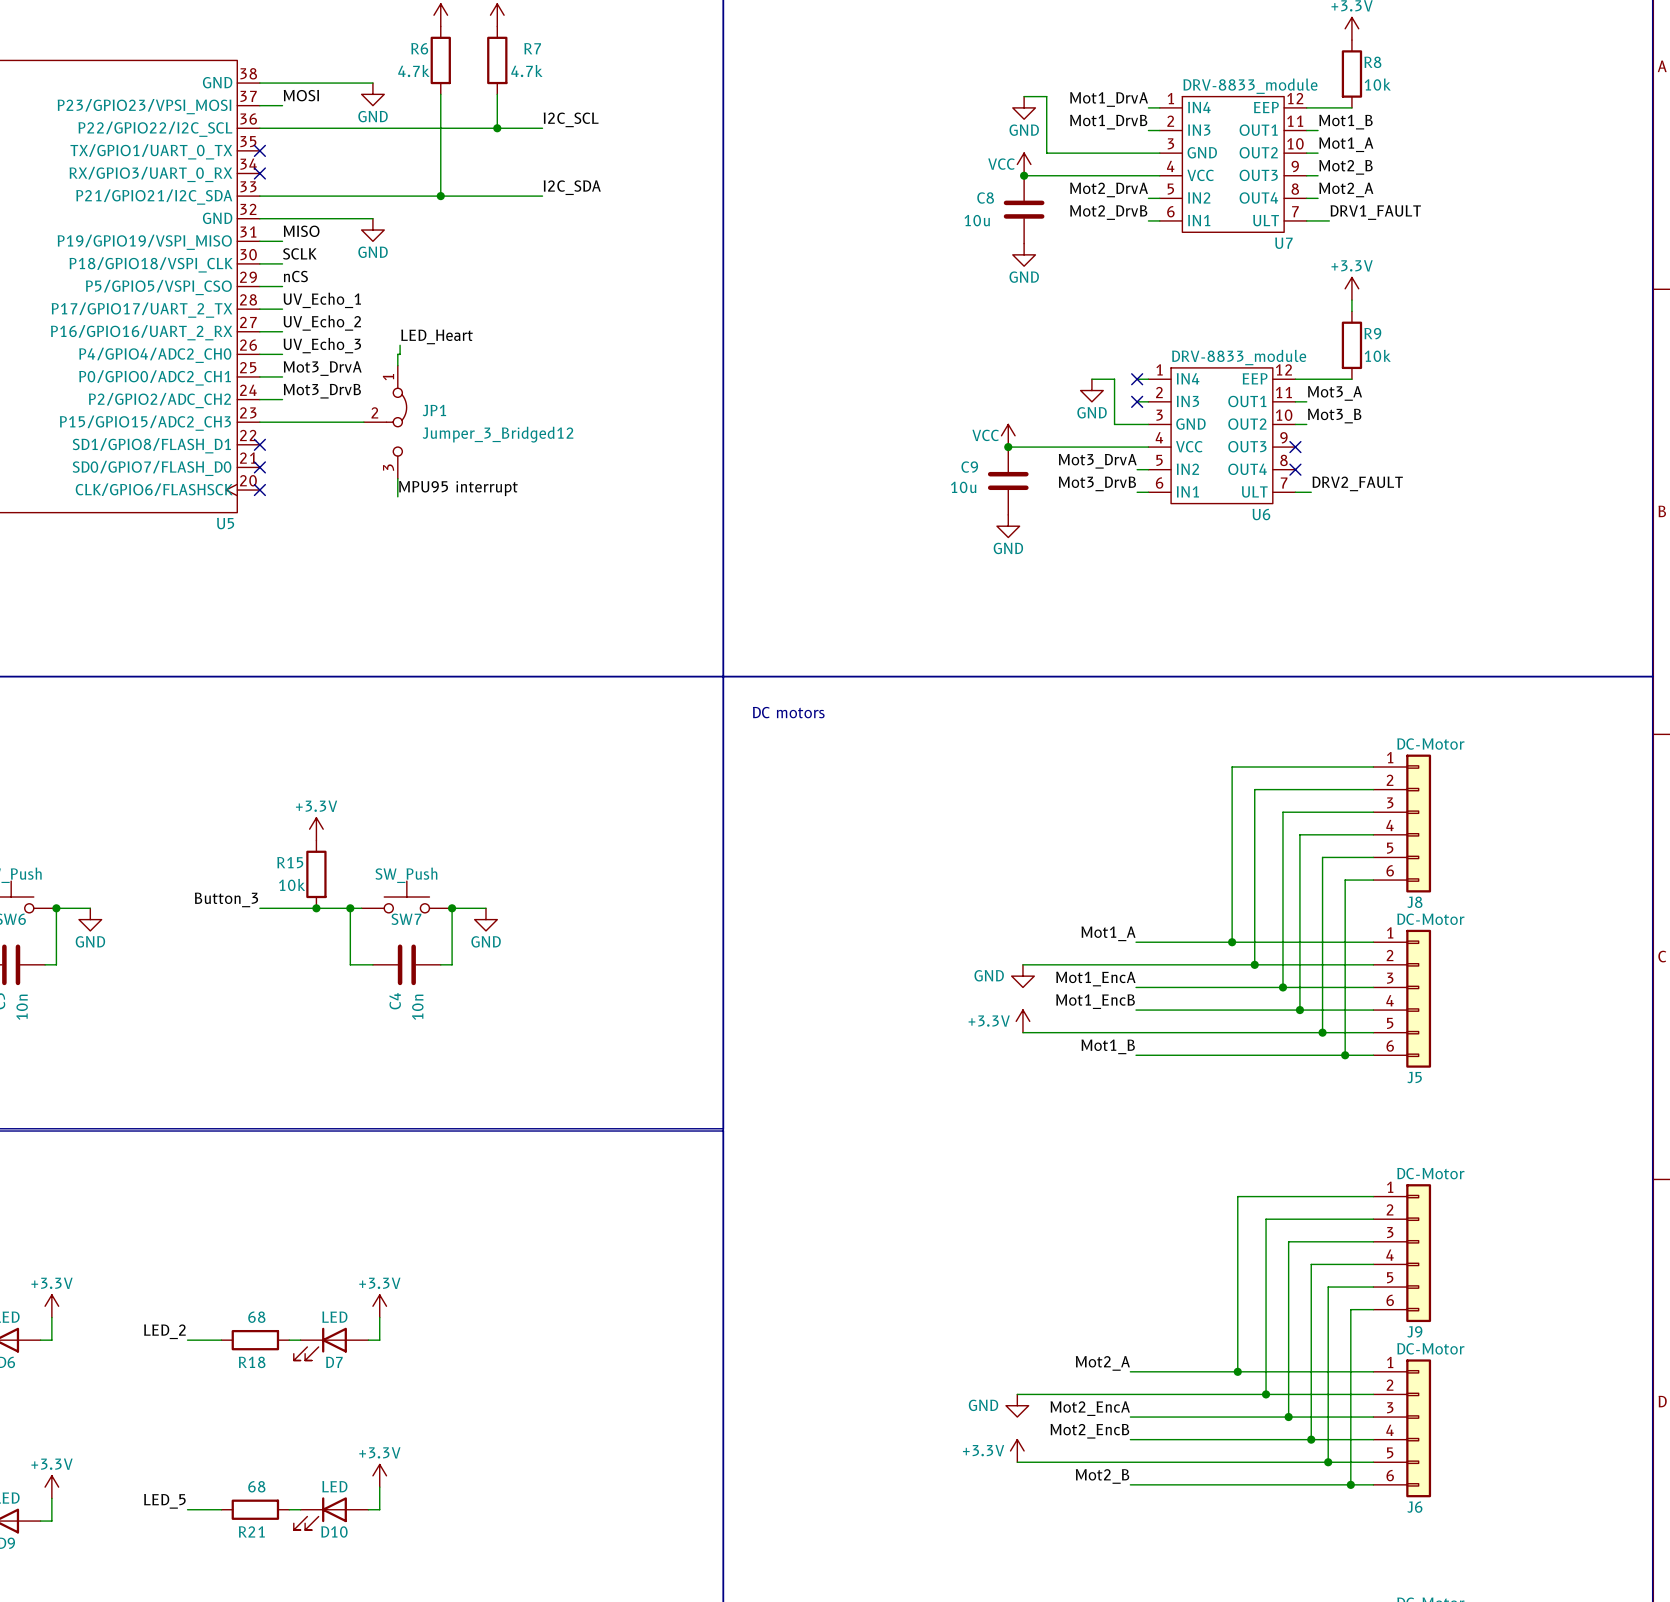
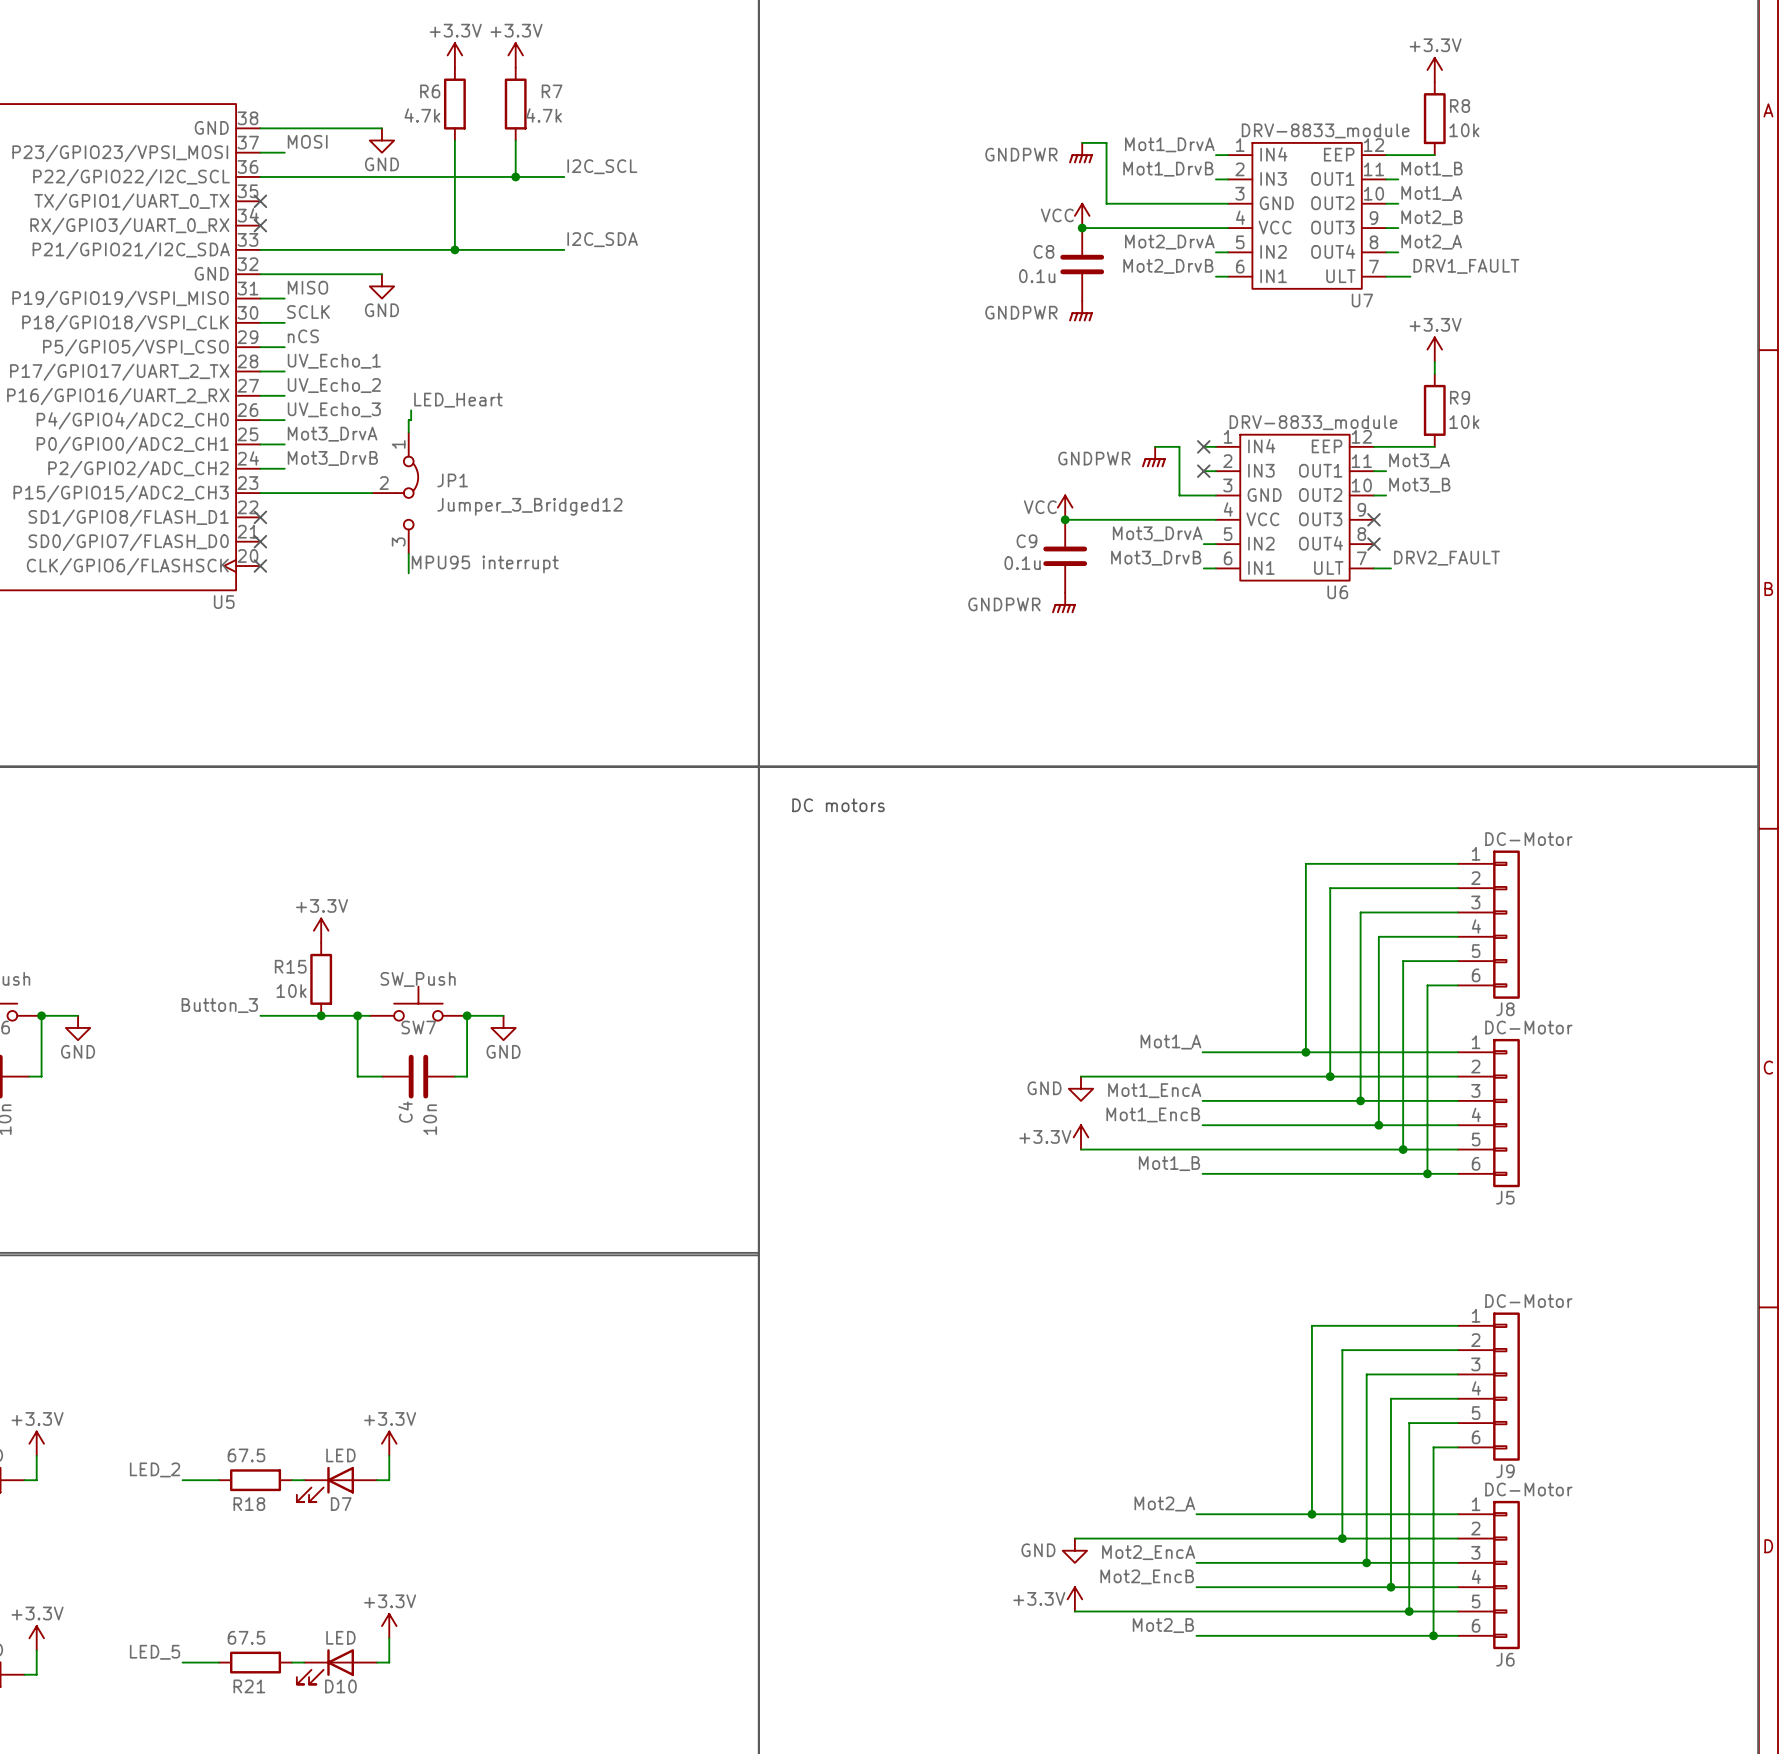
power symbol: GND (1024, 107) -> GNDPWR (1080, 153)
C8 value: 10u (977, 220) -> 0.1u (1037, 276)
power symbol: GND (1024, 254) -> GNDPWR (1080, 311)
power symbol: GND (1091, 390) -> GNDPWR (1153, 457)
C9 value: 10u (963, 487) -> 0.1u (1022, 563)
power symbol: GND (1008, 526) -> GNDPWR (1063, 602)
R18 value: 68 (256, 1317) -> 67.5 (246, 1455)
R21 value: 68 (256, 1486) -> 67.5 (246, 1637)

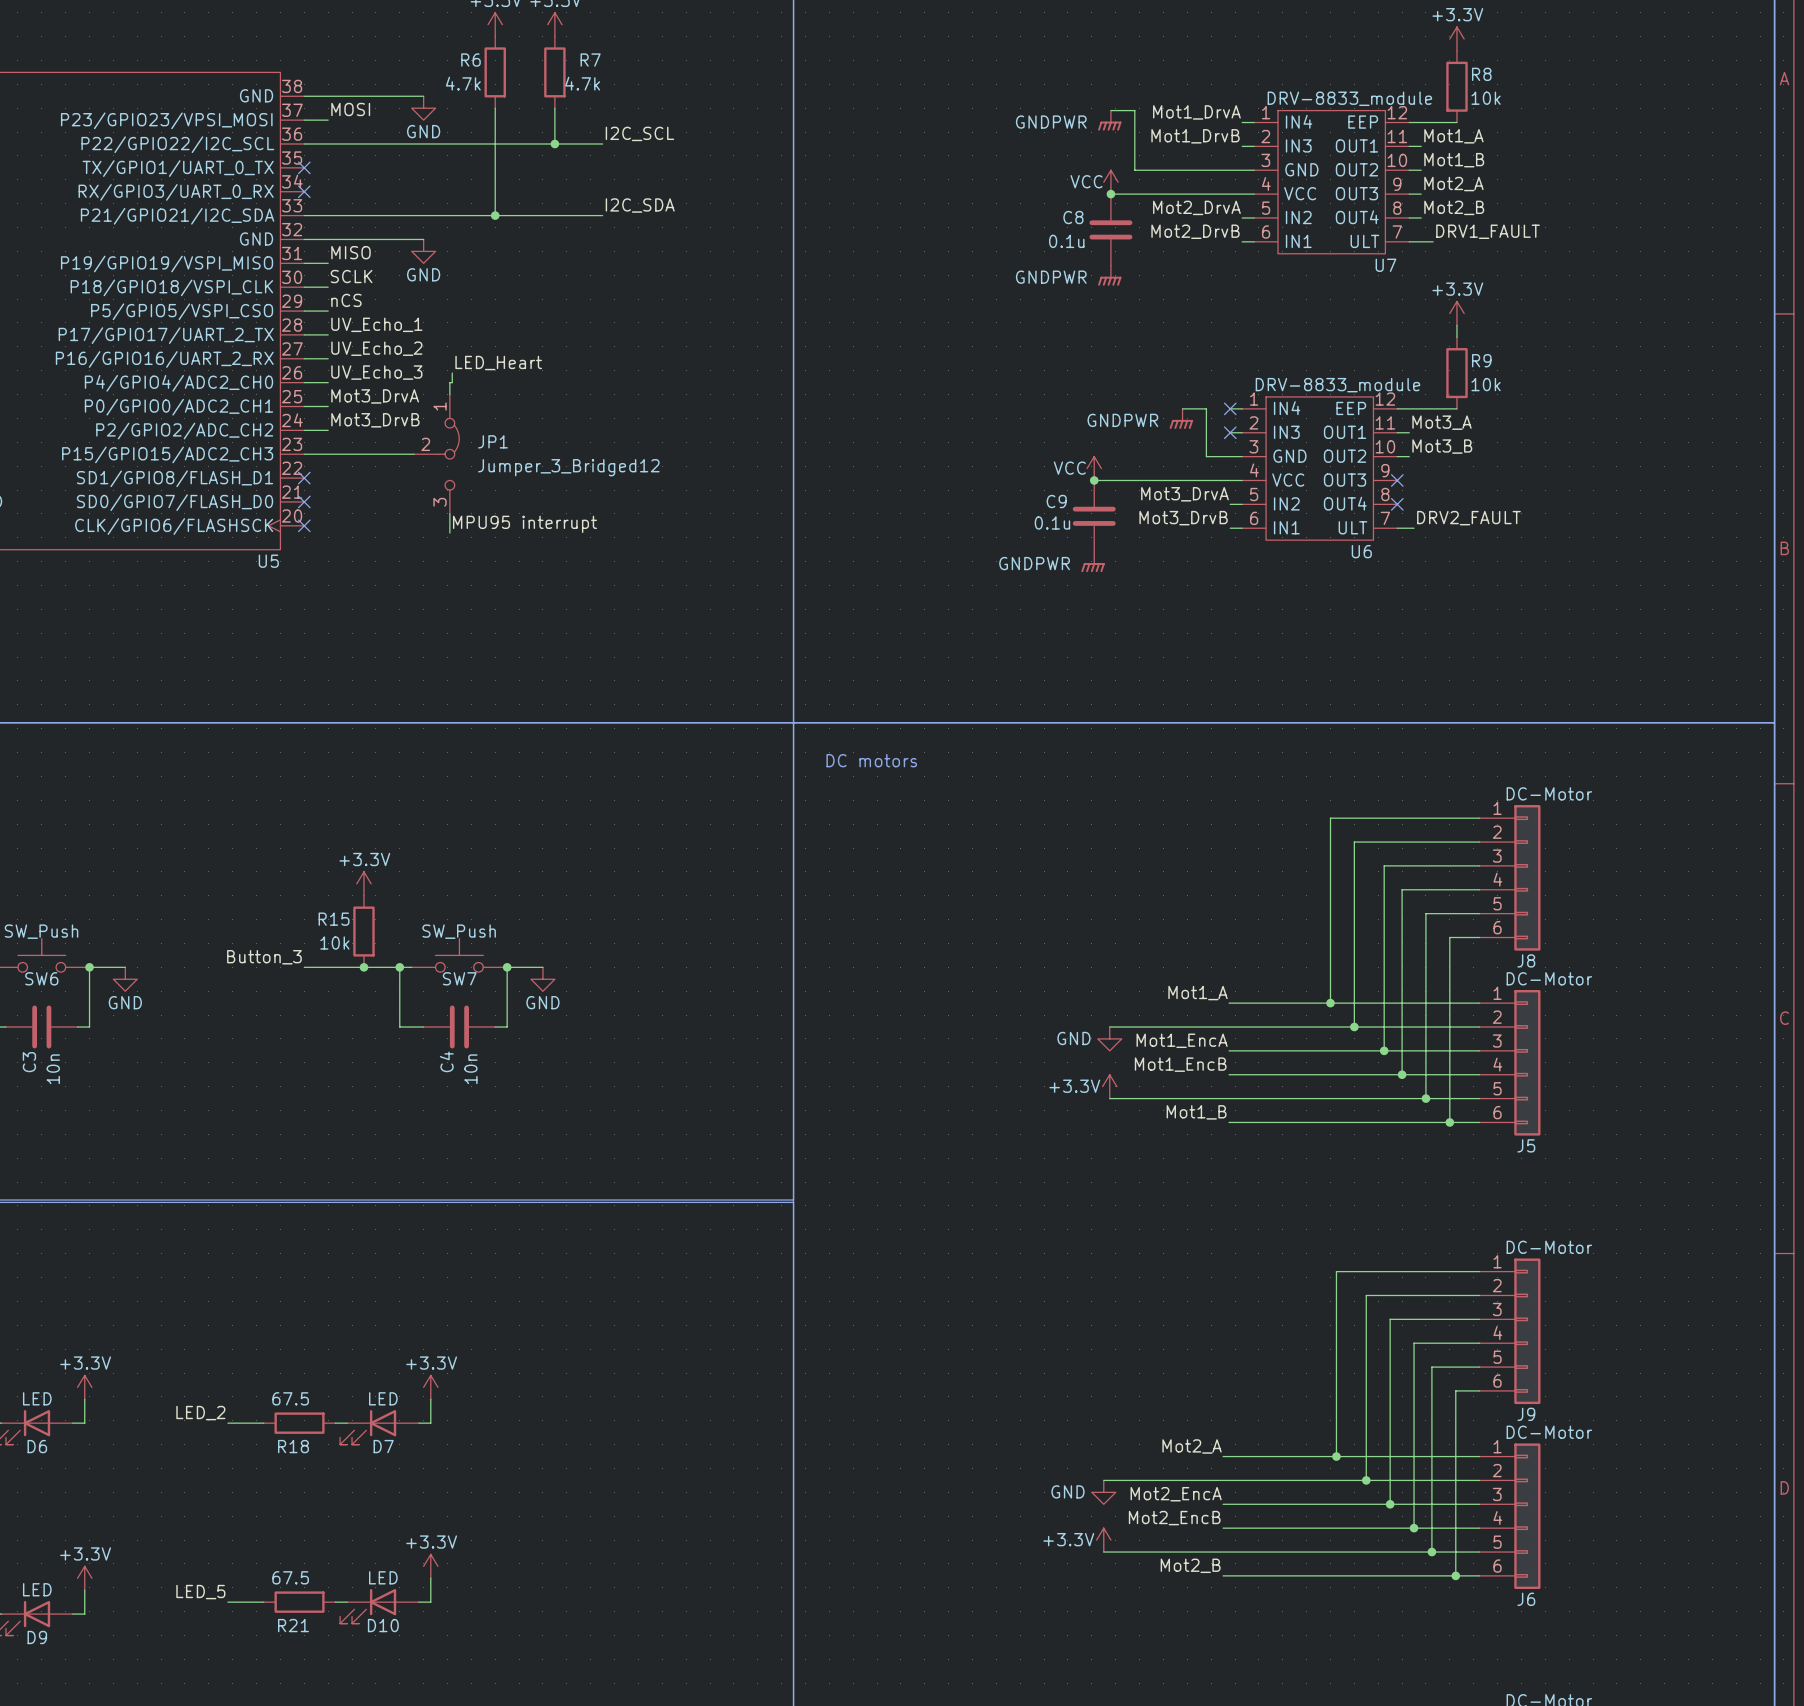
label: Mot1_B (1431, 169) -> Mot1_A (1453, 136)
label: Mot1_A (1431, 193) -> Mot1_B (1454, 160)
label: Mot2_B (1431, 217) -> Mot2_A (1453, 184)
label: Mot2_A (1431, 242) -> Mot2_B (1454, 207)

